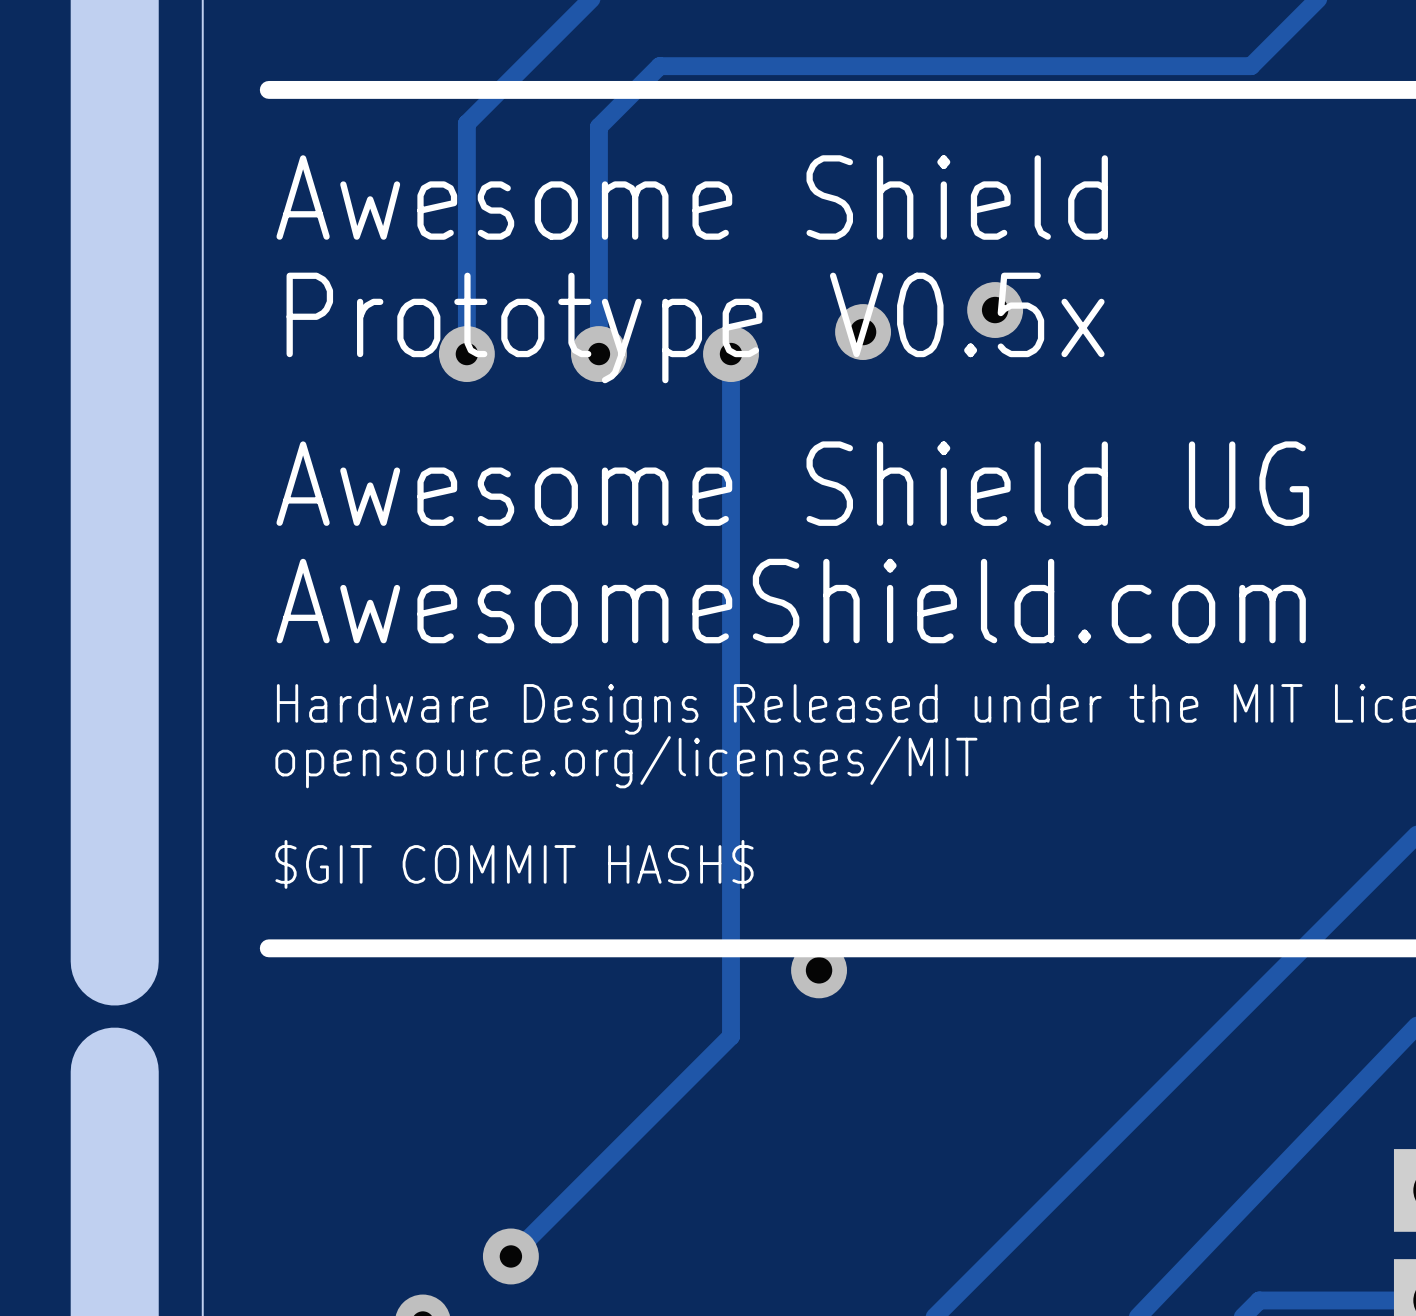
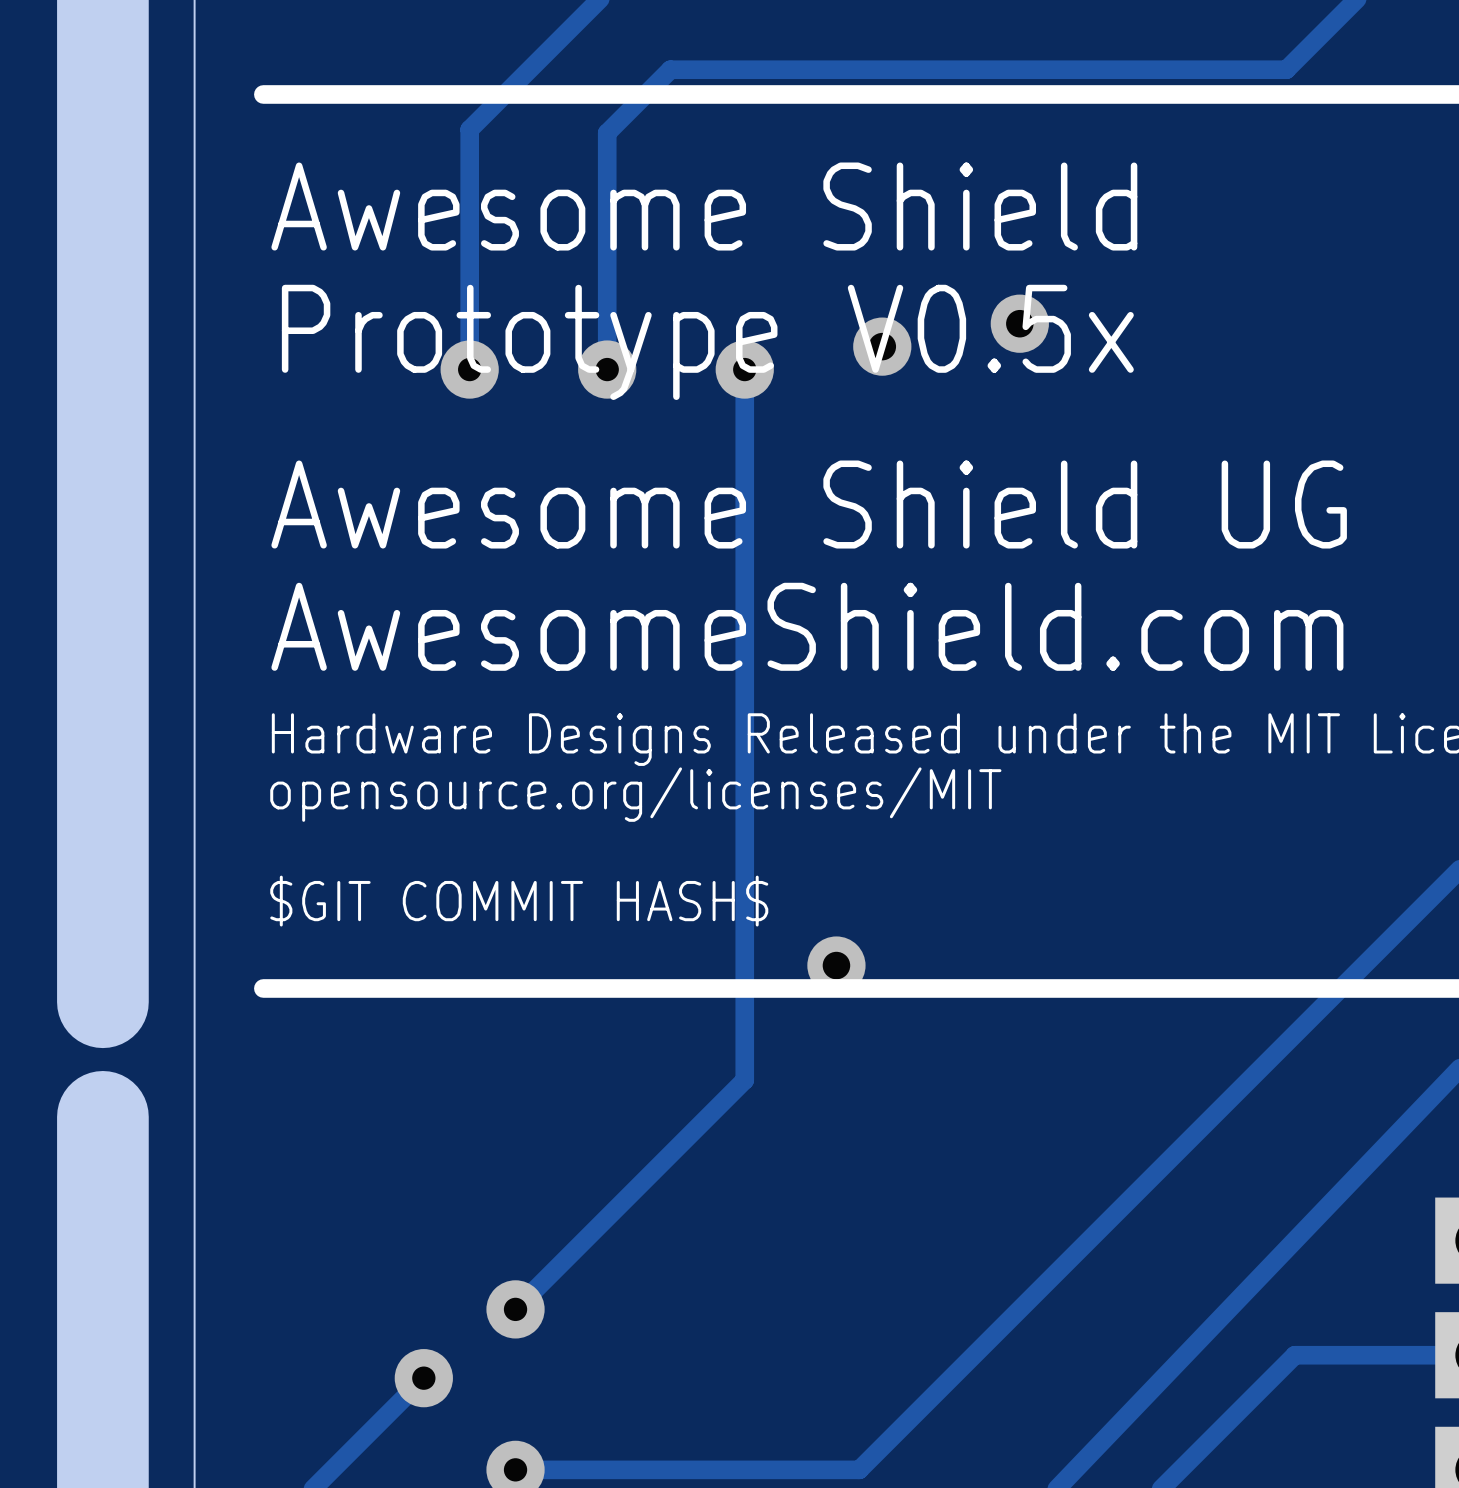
via position: (819, 970) -> (836, 965)

